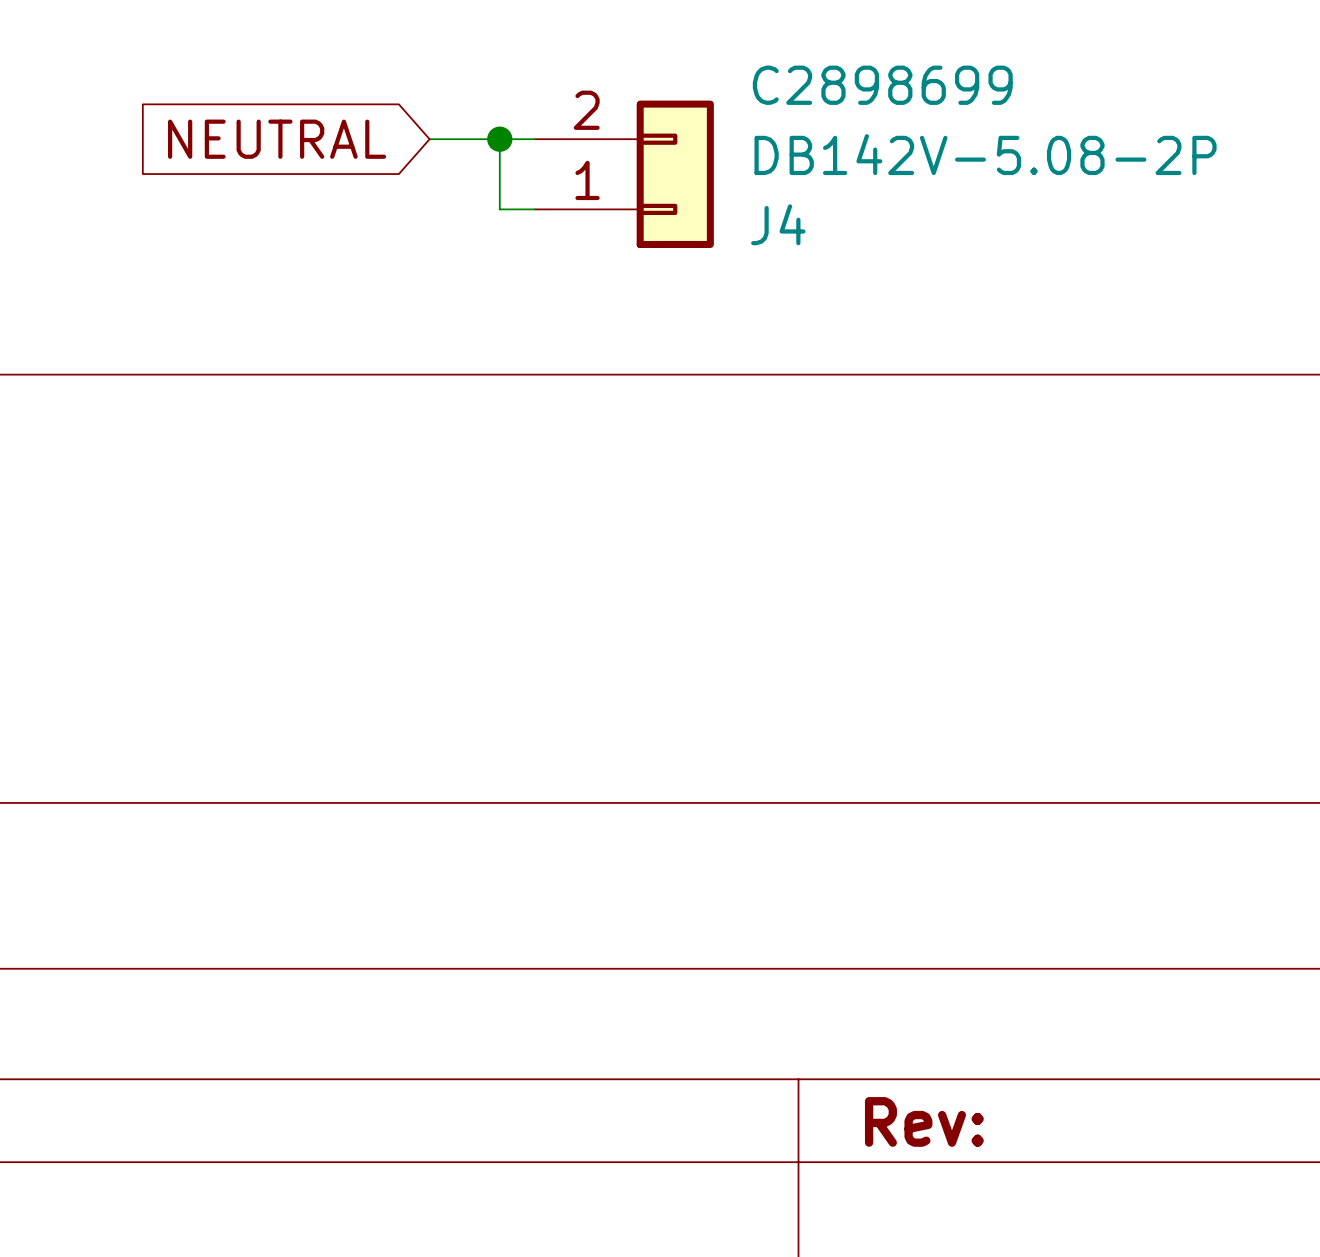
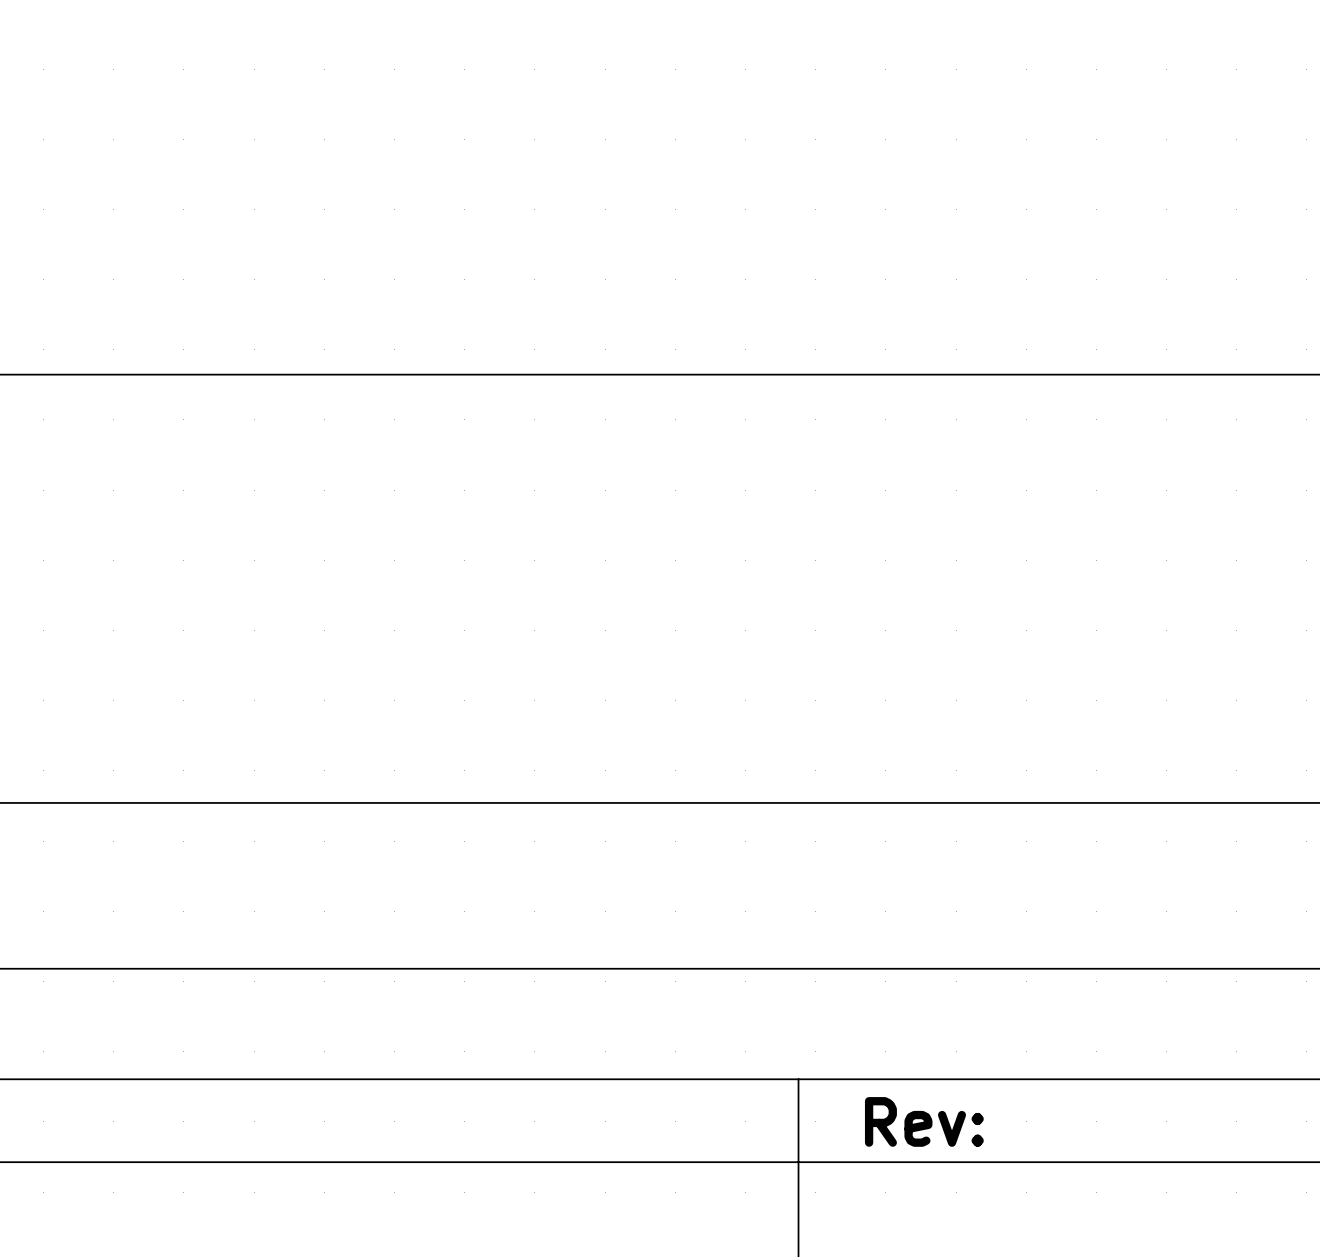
global label: NEUTRAL (277, 139) -> none
wire: (429, 139) (534, 139) -> none
wire: (499, 139) (499, 209) (534, 209) -> none
junction: (499, 139) -> none
J4: DB142V-5.08-2P (624, 174) -> none

